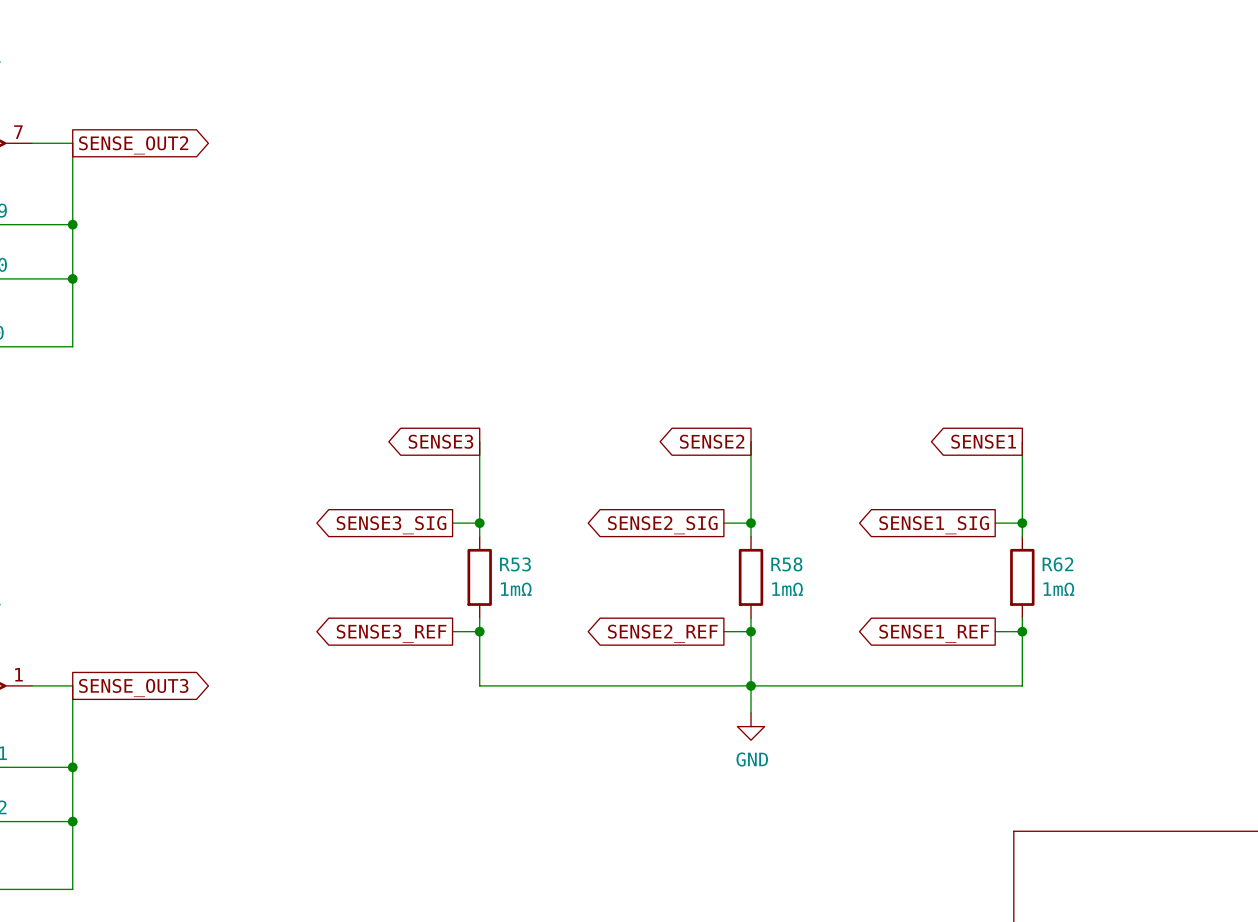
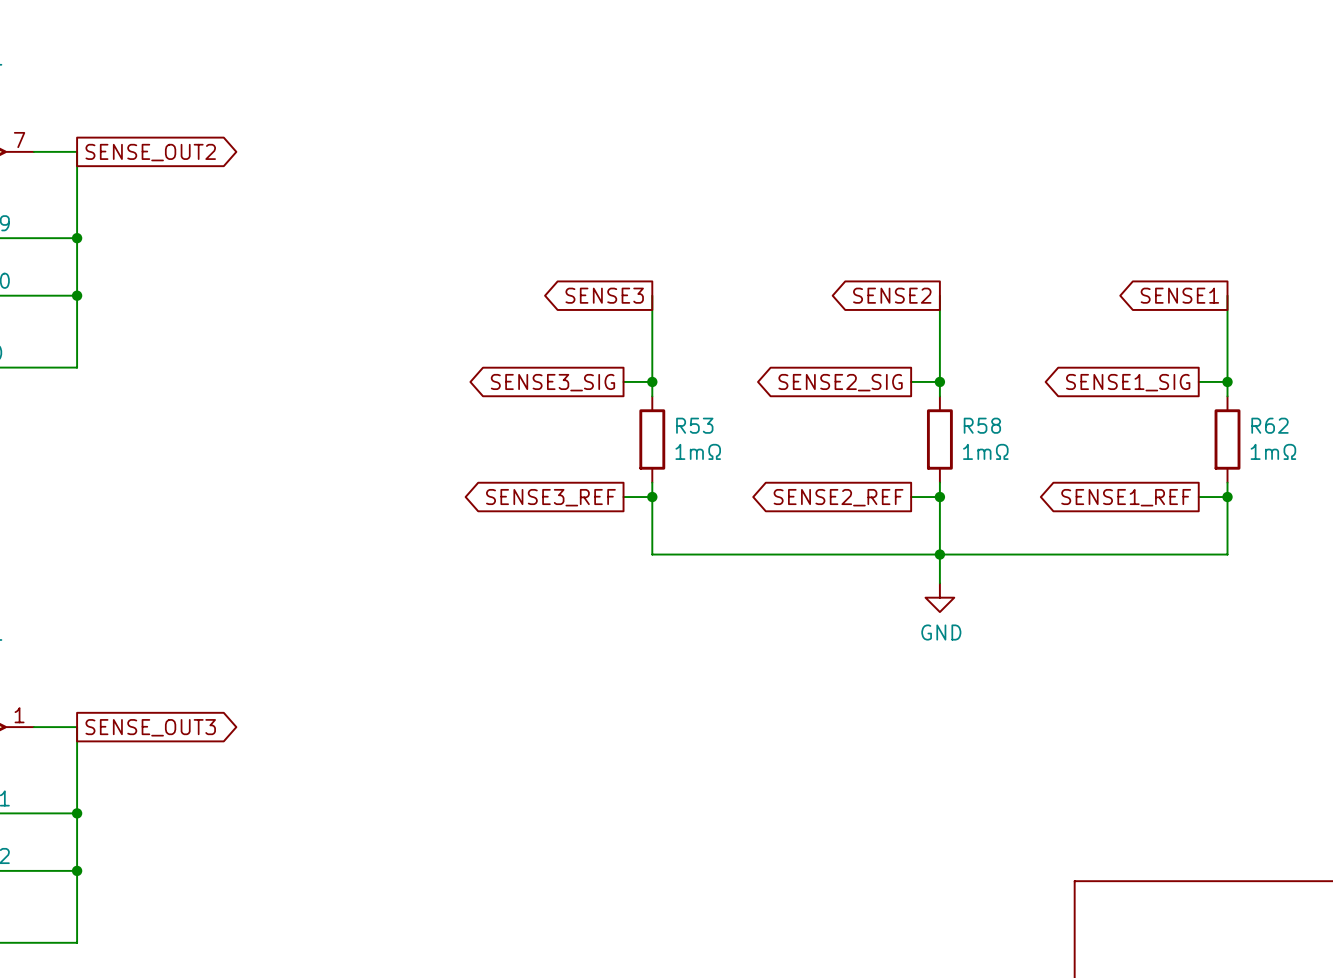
junction: none -> (652, 381)
wire: none -> (911, 381) (939, 381)
junction: none -> (939, 381)
wire: none -> (1198, 381) (1227, 381)
junction: none -> (1227, 381)
global label position: SENSE3 (440, 441) -> SENSE3 (604, 295)
wire: (479, 441) (479, 536) -> (652, 295) (652, 396)
global label position: SENSE2 (712, 441) -> SENSE2 (892, 295)
wire: (751, 441) (751, 536) -> (939, 295) (939, 396)
global label position: SENSE1 (983, 441) -> SENSE1 (1179, 295)
wire: (1022, 441) (1022, 536) -> (1227, 295) (1227, 396)
wire: none -> (652, 482) (652, 554) (767, 554)
wire: none -> (1227, 482) (1227, 554) (1083, 554)
junction: none -> (652, 497)
junction: none -> (939, 497)
junction: none -> (1227, 497)
wire: (452, 523) (479, 523) -> (623, 381) (652, 381)
junction: (479, 523) -> none
wire: none -> (796, 554) (1054, 554)
junction: (751, 523) -> none
junction: none -> (939, 554)
junction: (1022, 523) -> none
global label position: SENSE3_SIG (391, 525) -> SENSE3_SIG (552, 382)
global label position: SENSE2_SIG (662, 525) -> SENSE2_SIG (840, 382)
global label position: SENSE1_SIG (934, 525) -> SENSE1_SIG (1128, 382)
R53 position: (479, 577) -> (652, 439)
R58 position: (751, 577) -> (939, 439)
R62 position: (1022, 577) -> (1227, 439)
wire: (479, 618) (479, 685) (1022, 685) (1022, 618) -> none
wire: (751, 618) (751, 713) -> (939, 482) (939, 583)
wire: (452, 631) (479, 631) -> (623, 497) (652, 497)
junction: (479, 631) -> none
wire: (723, 631) (751, 631) -> (911, 497) (939, 497)
junction: (751, 631) -> none
wire: (995, 631) (1022, 631) -> (1198, 497) (1227, 497)
junction: (1022, 631) -> none
global label position: SENSE3_REF (391, 633) -> SENSE3_REF (550, 497)
global label position: SENSE2_REF (662, 633) -> SENSE2_REF (838, 497)
global label position: SENSE1_REF (934, 633) -> SENSE1_REF (1126, 497)
junction: (751, 685) -> none
power symbol position: GND (751, 726) -> GND (939, 597)

